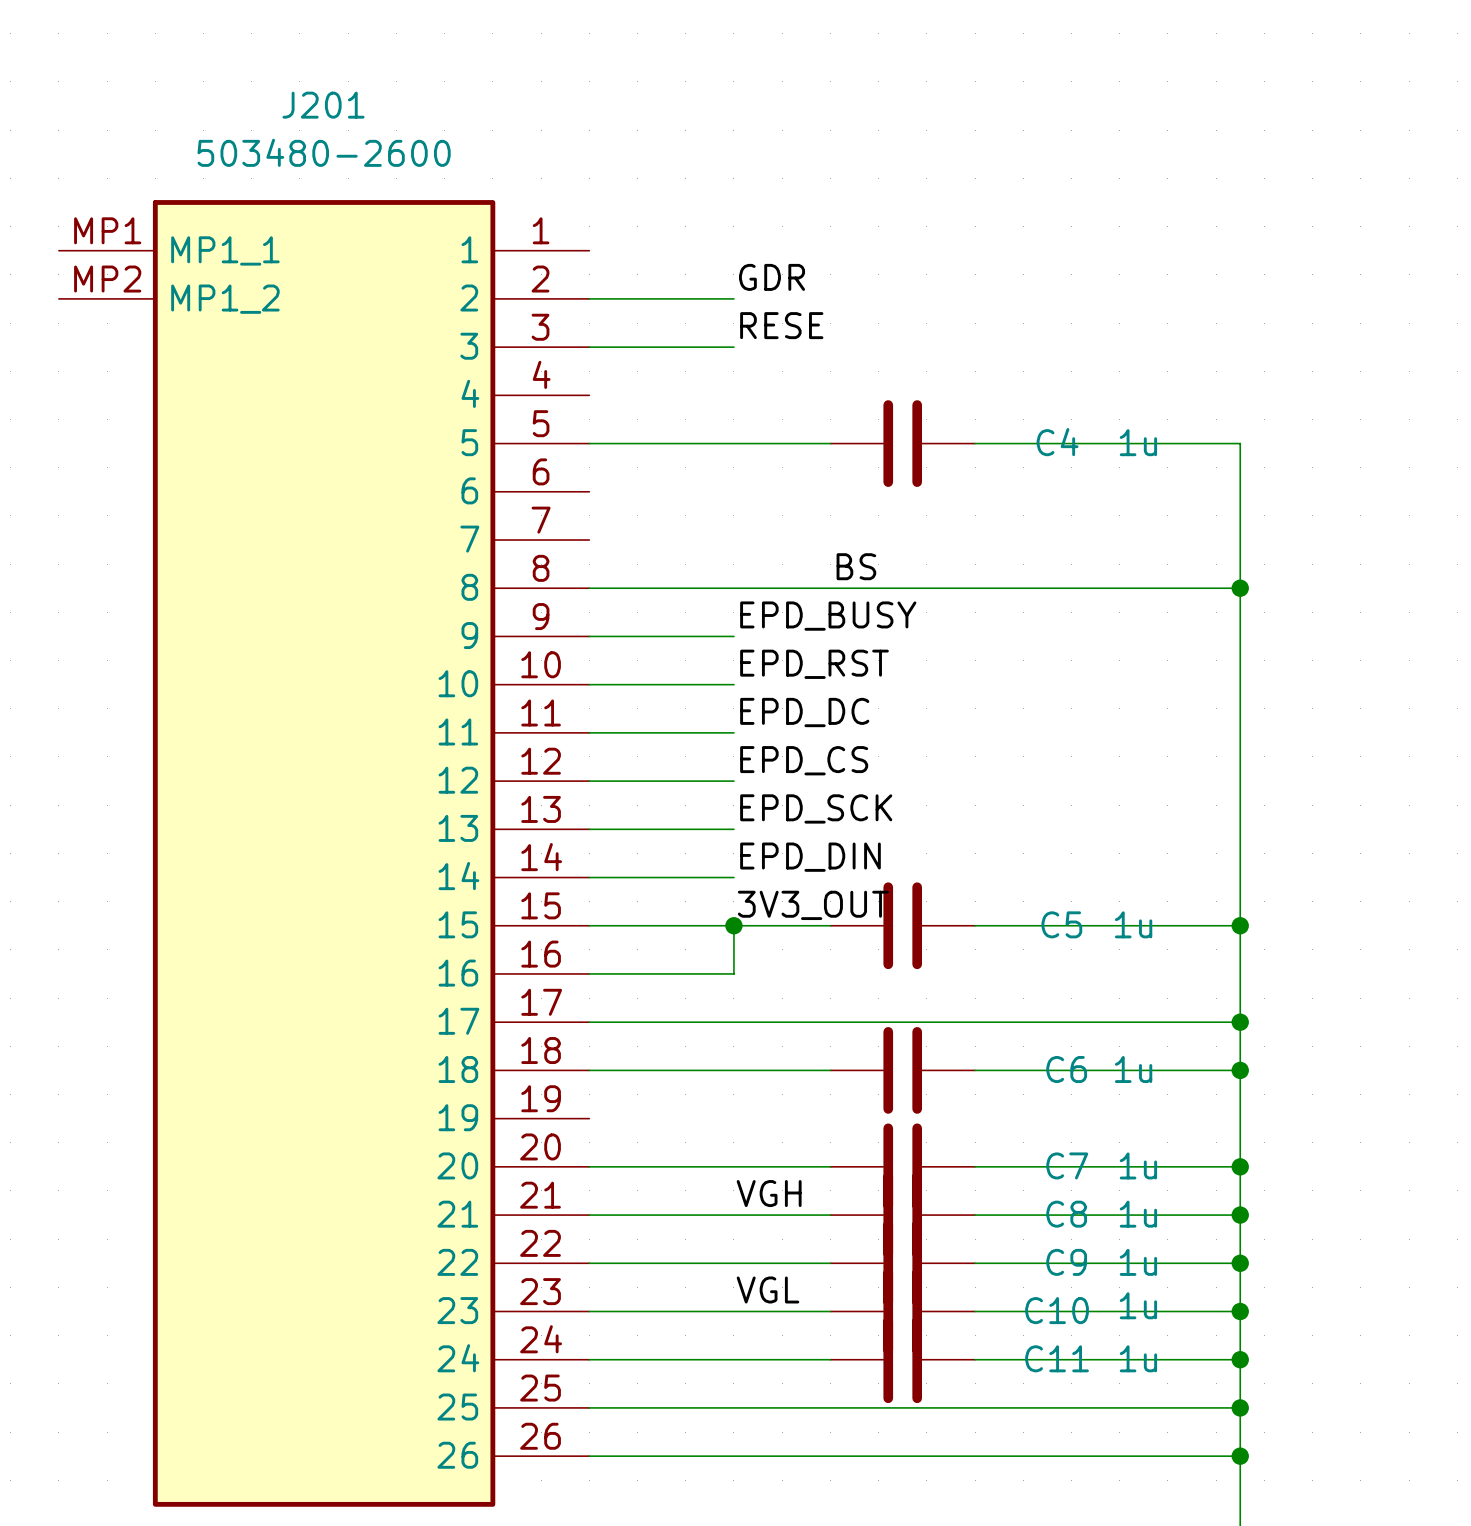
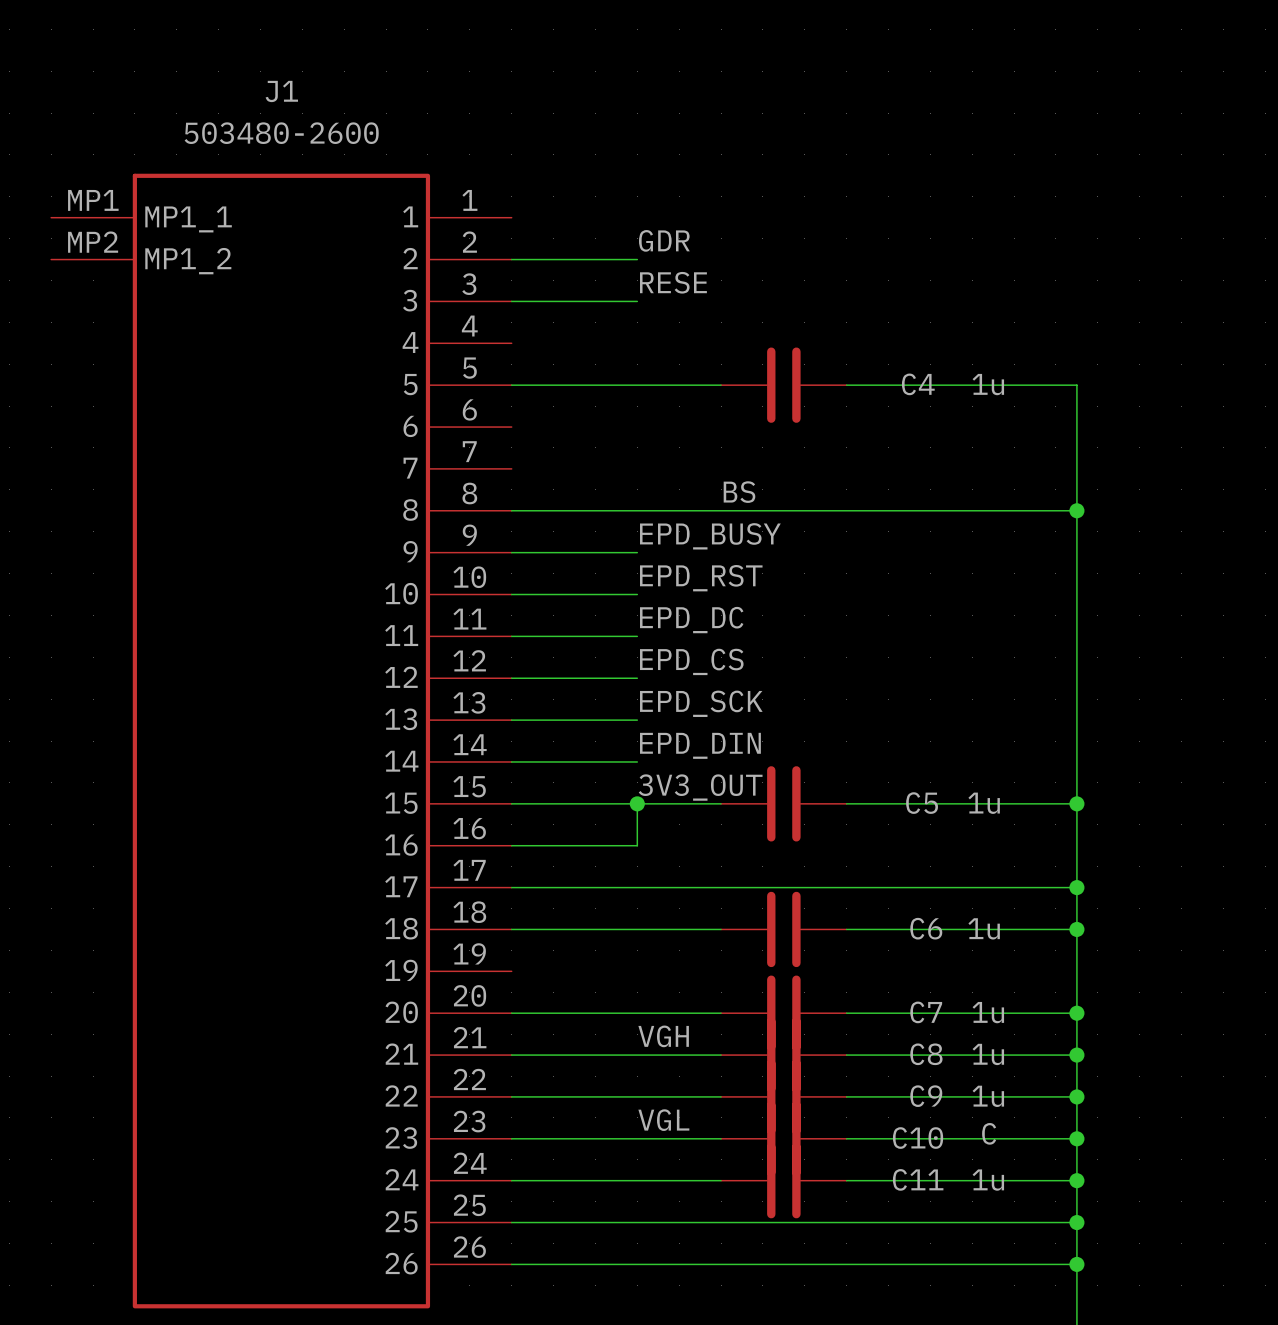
J201 name: J201 (323, 105) -> J1 (281, 91)
C10 value: 1u (1138, 1305) -> C (989, 1133)

